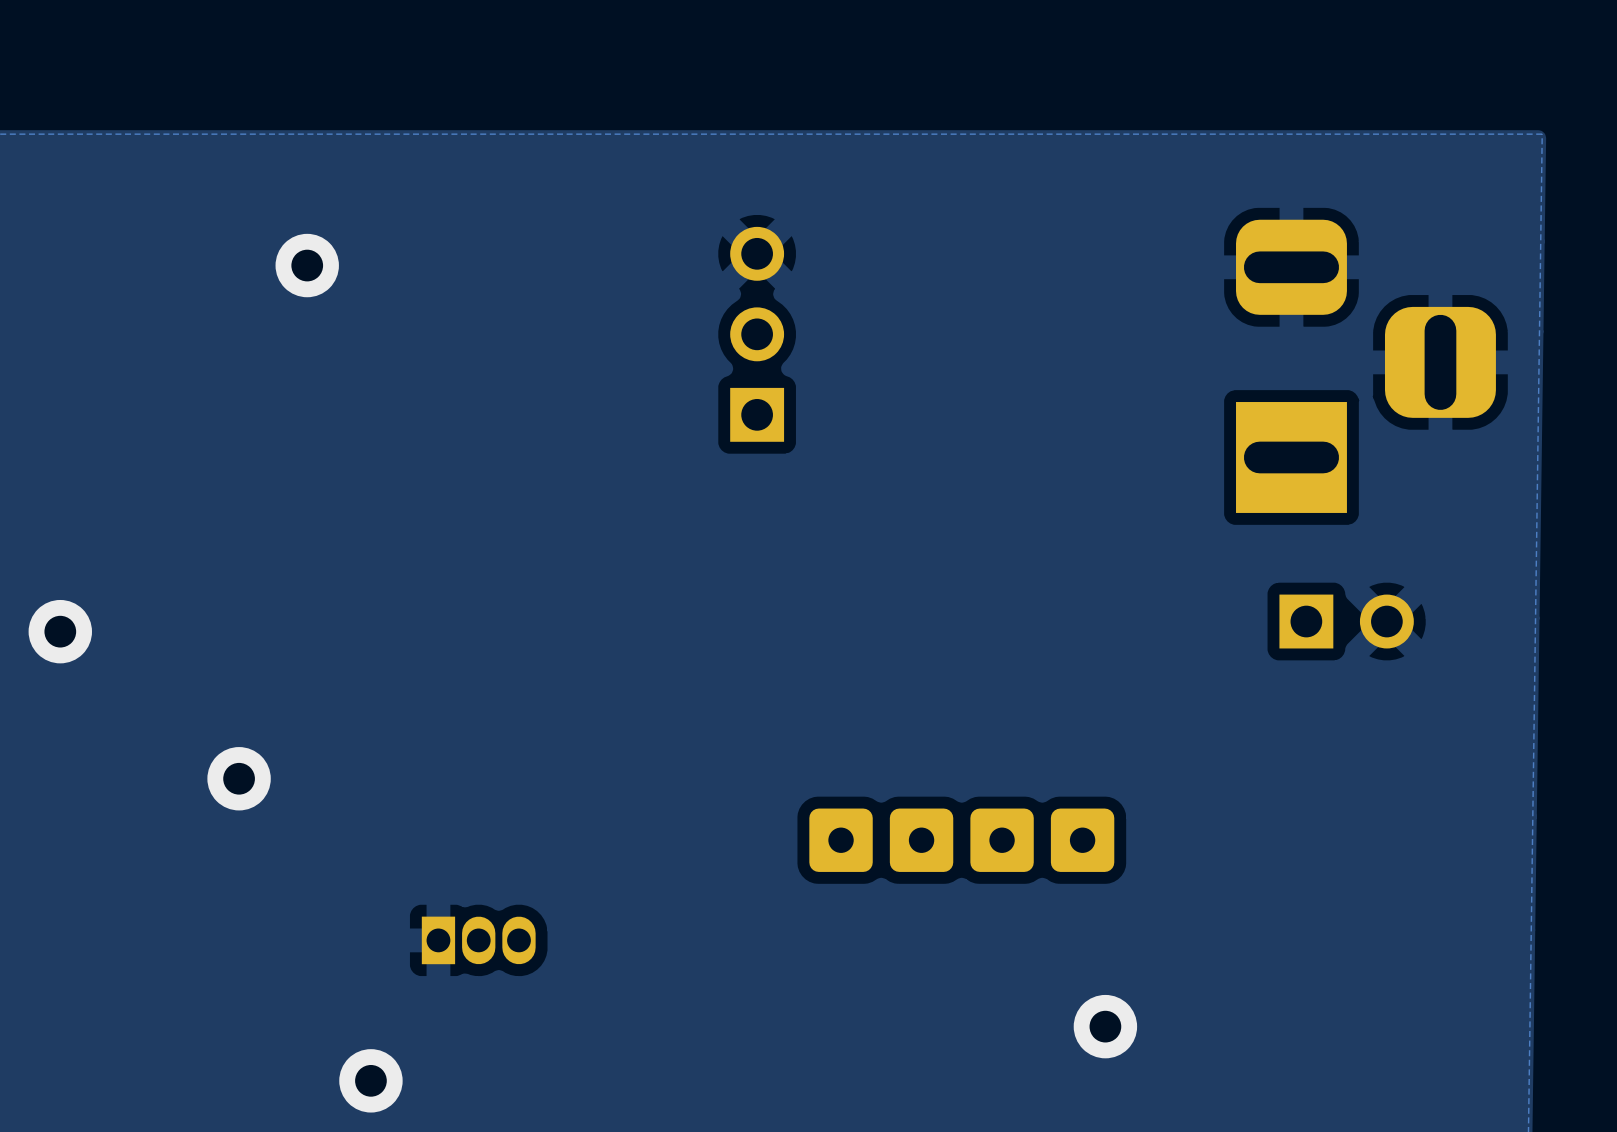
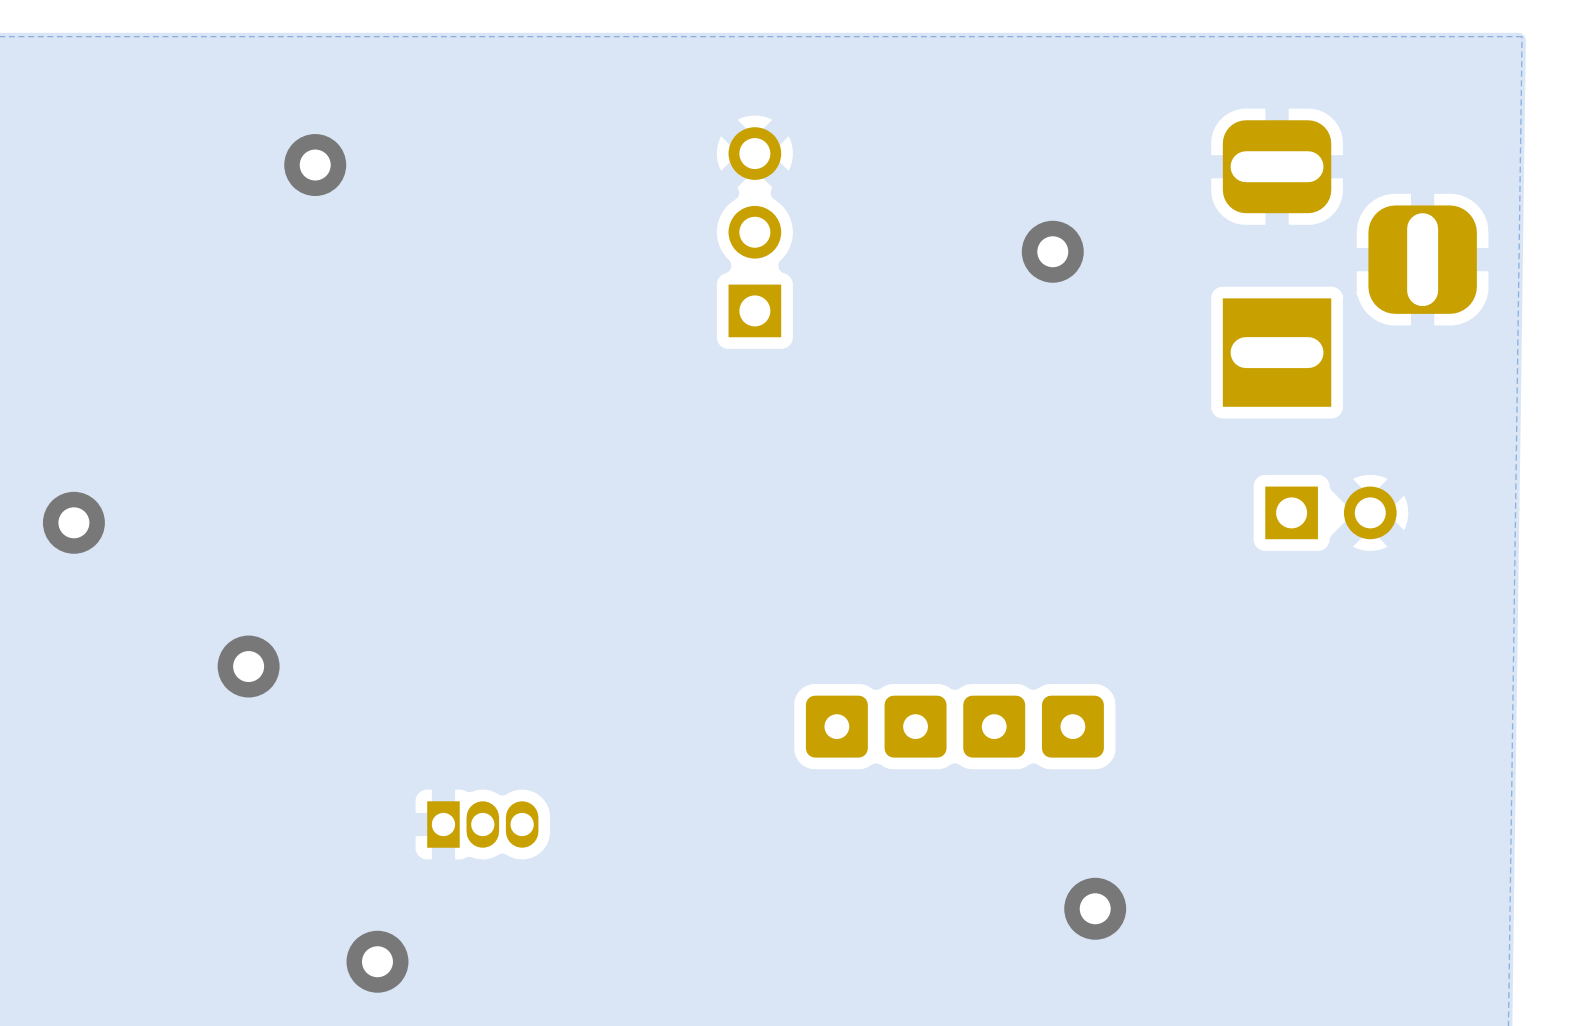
via: none -> (1052, 251)

